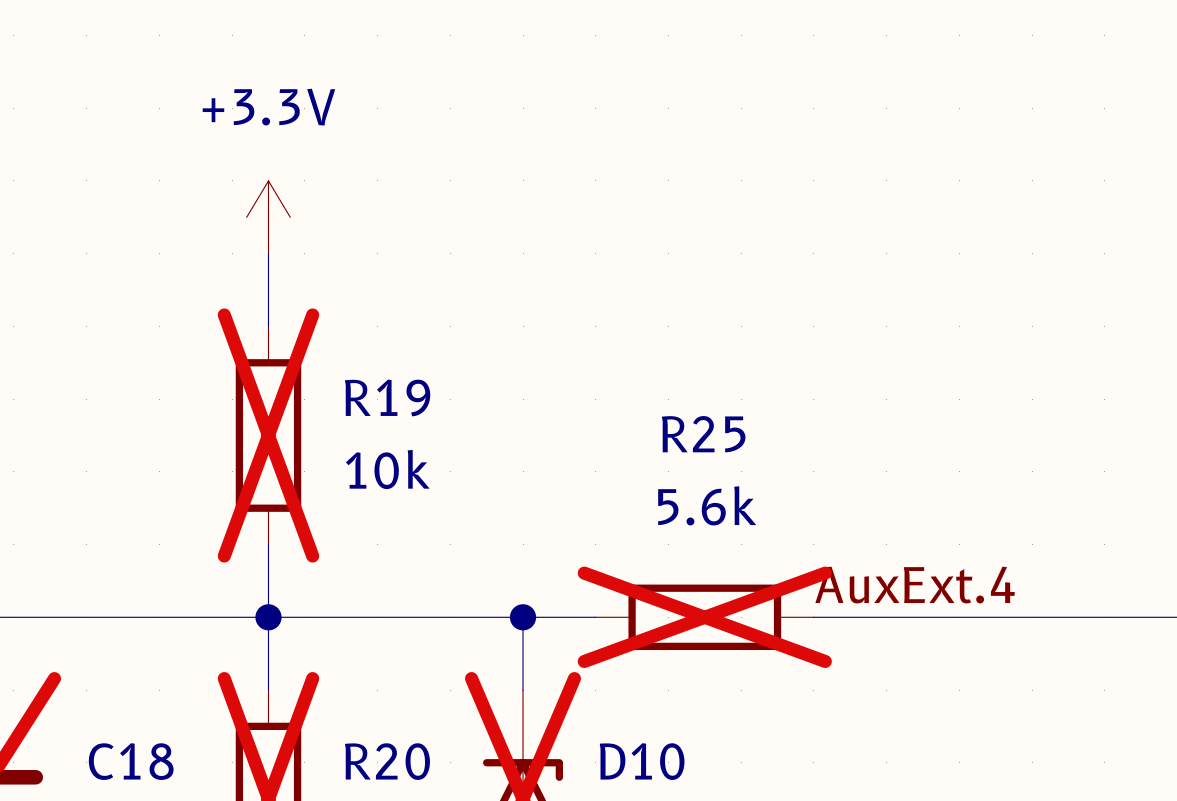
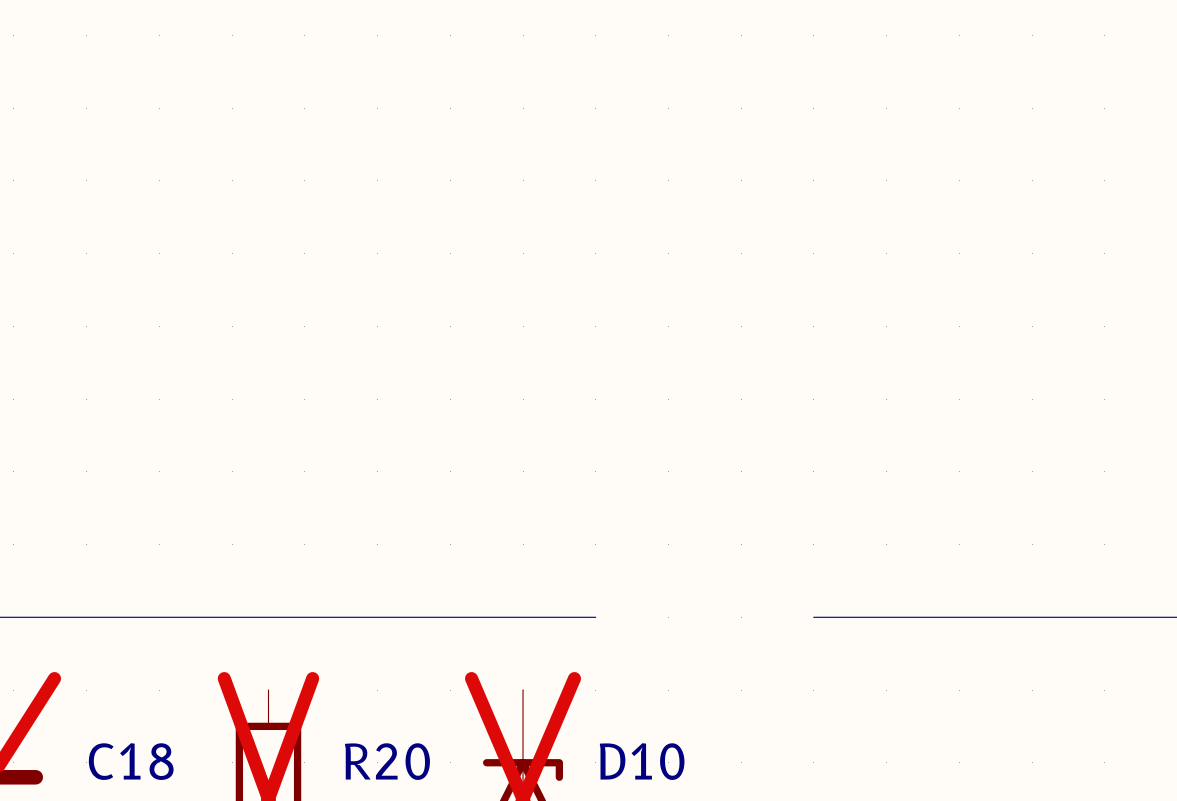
power symbol: +3.3V (268, 217) -> none
wire: (268, 253) (268, 326) -> none
R19: 10k (268, 435) -> none
wire: (268, 544) (268, 690) -> none
label: AuxExt.4 (915, 585) -> none
junction: (268, 617) -> none
wire: (523, 617) (523, 690) -> none
junction: (523, 617) -> none
R25: 5.6k (704, 617) -> none

